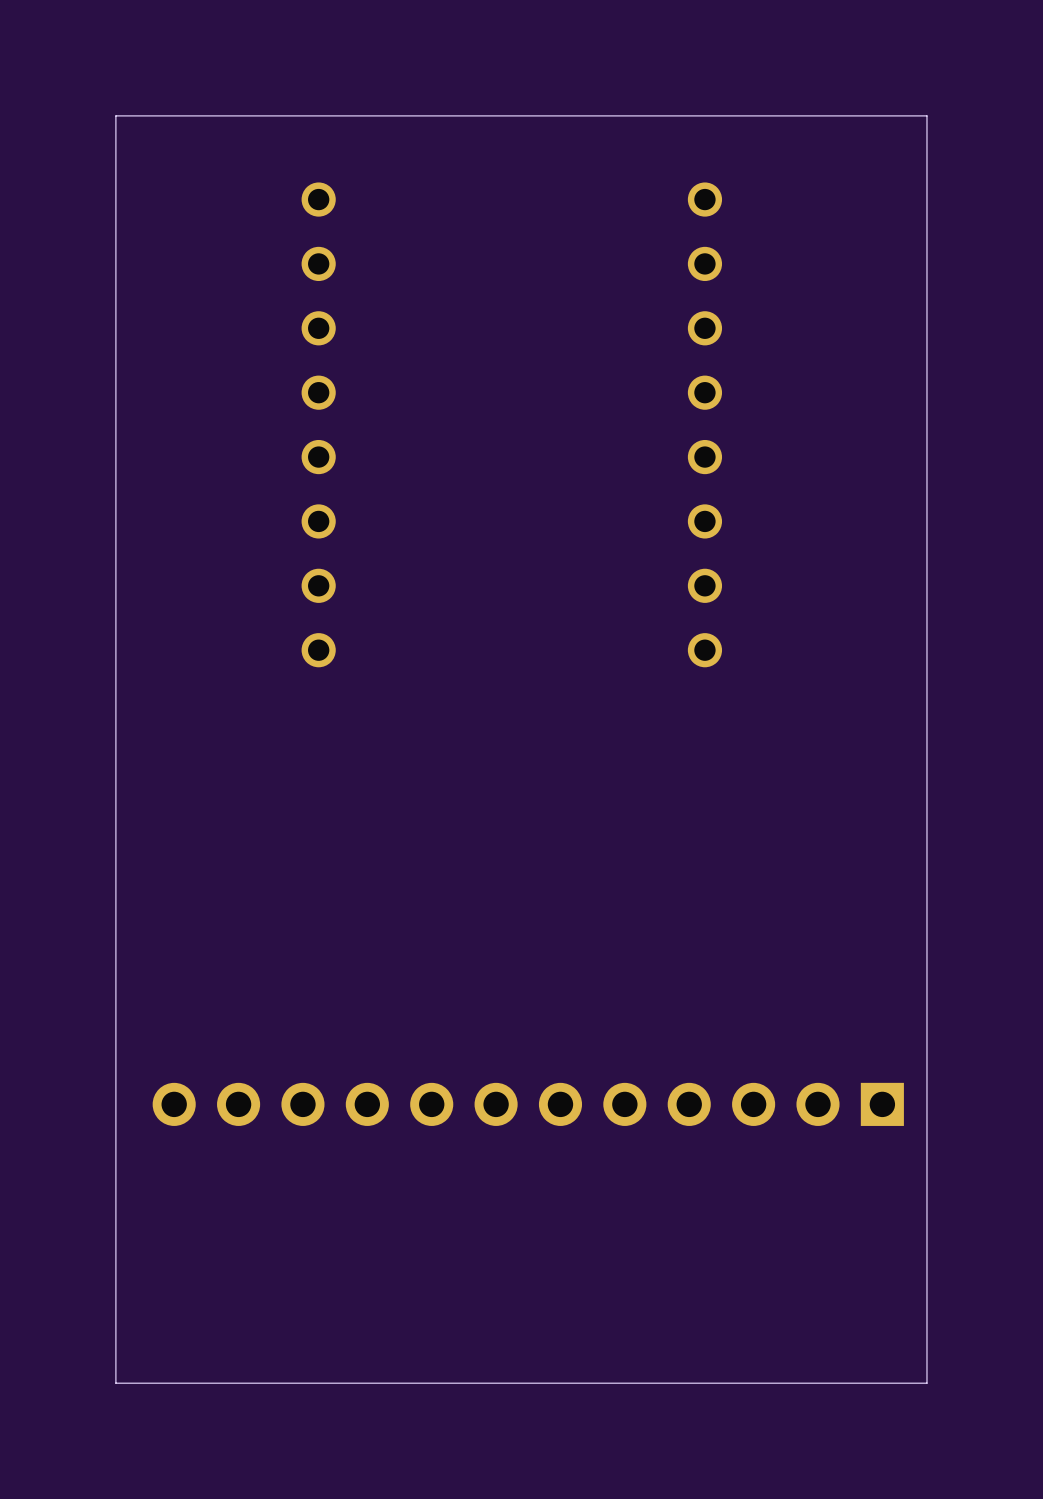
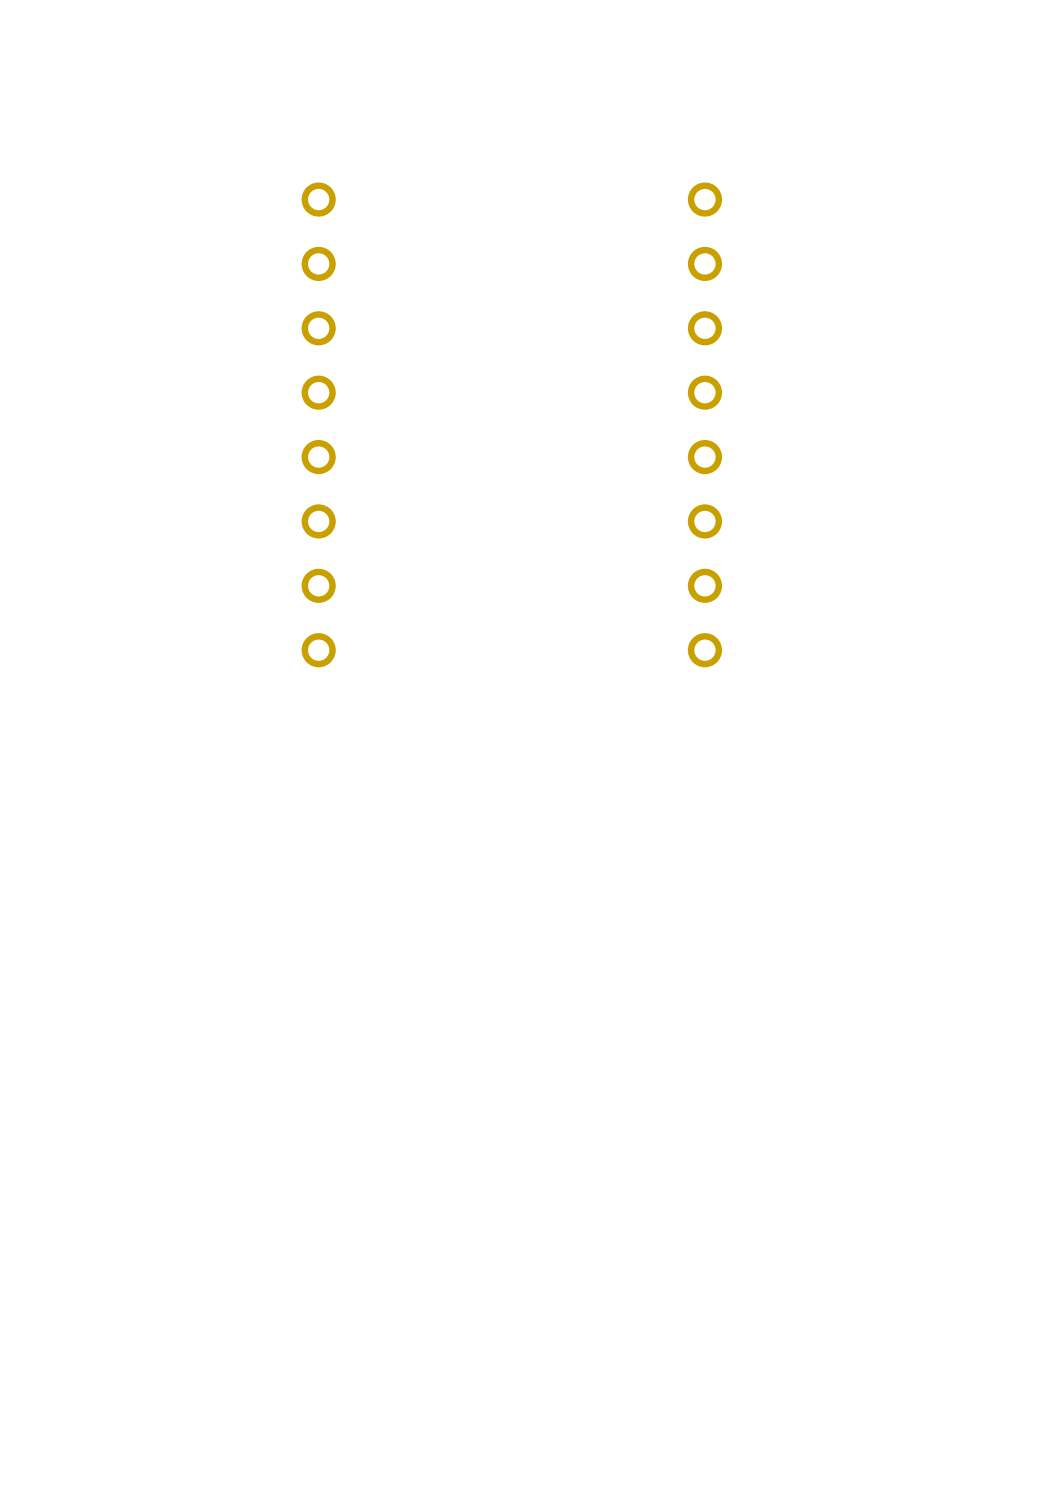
board edge: (926, 115) (115, 115) (115, 1383) (926, 1383) (926, 115) -> none
part: (528, 1104) -> none

